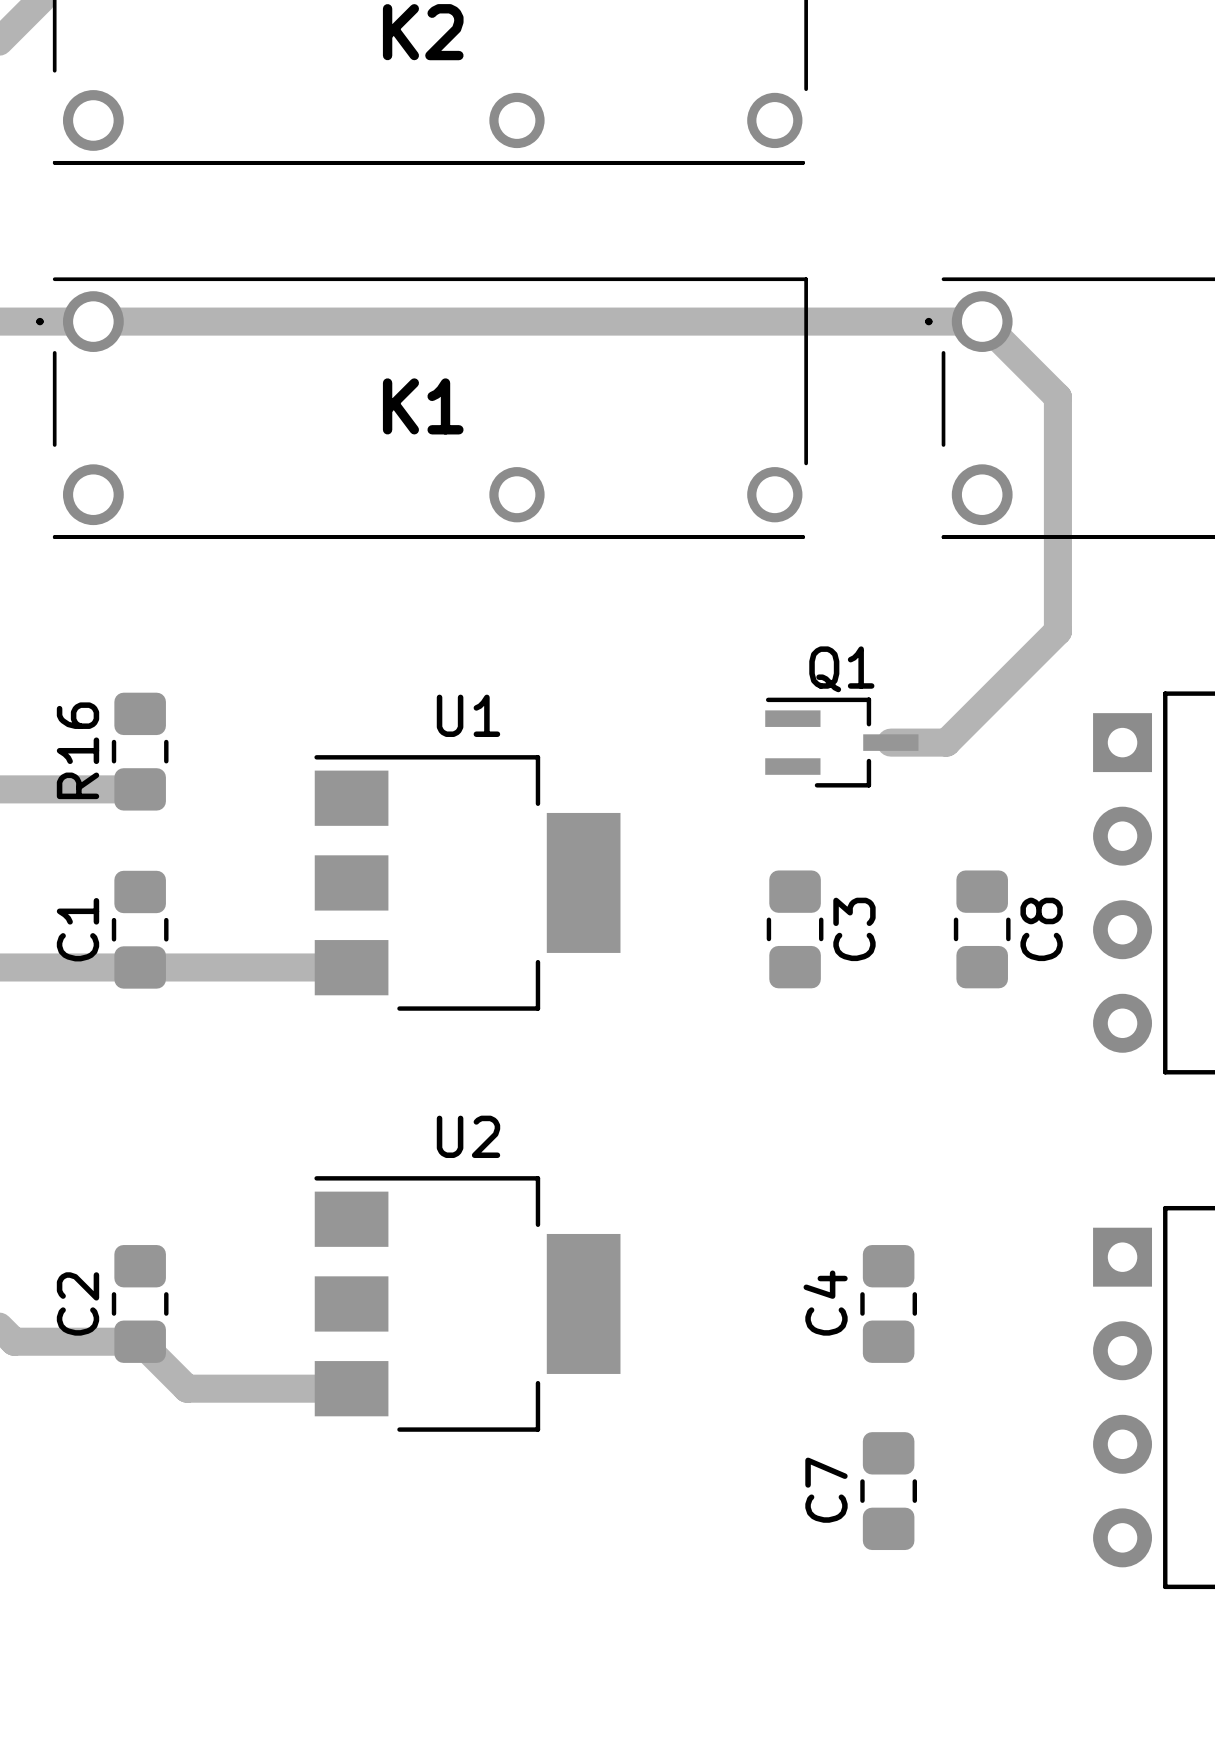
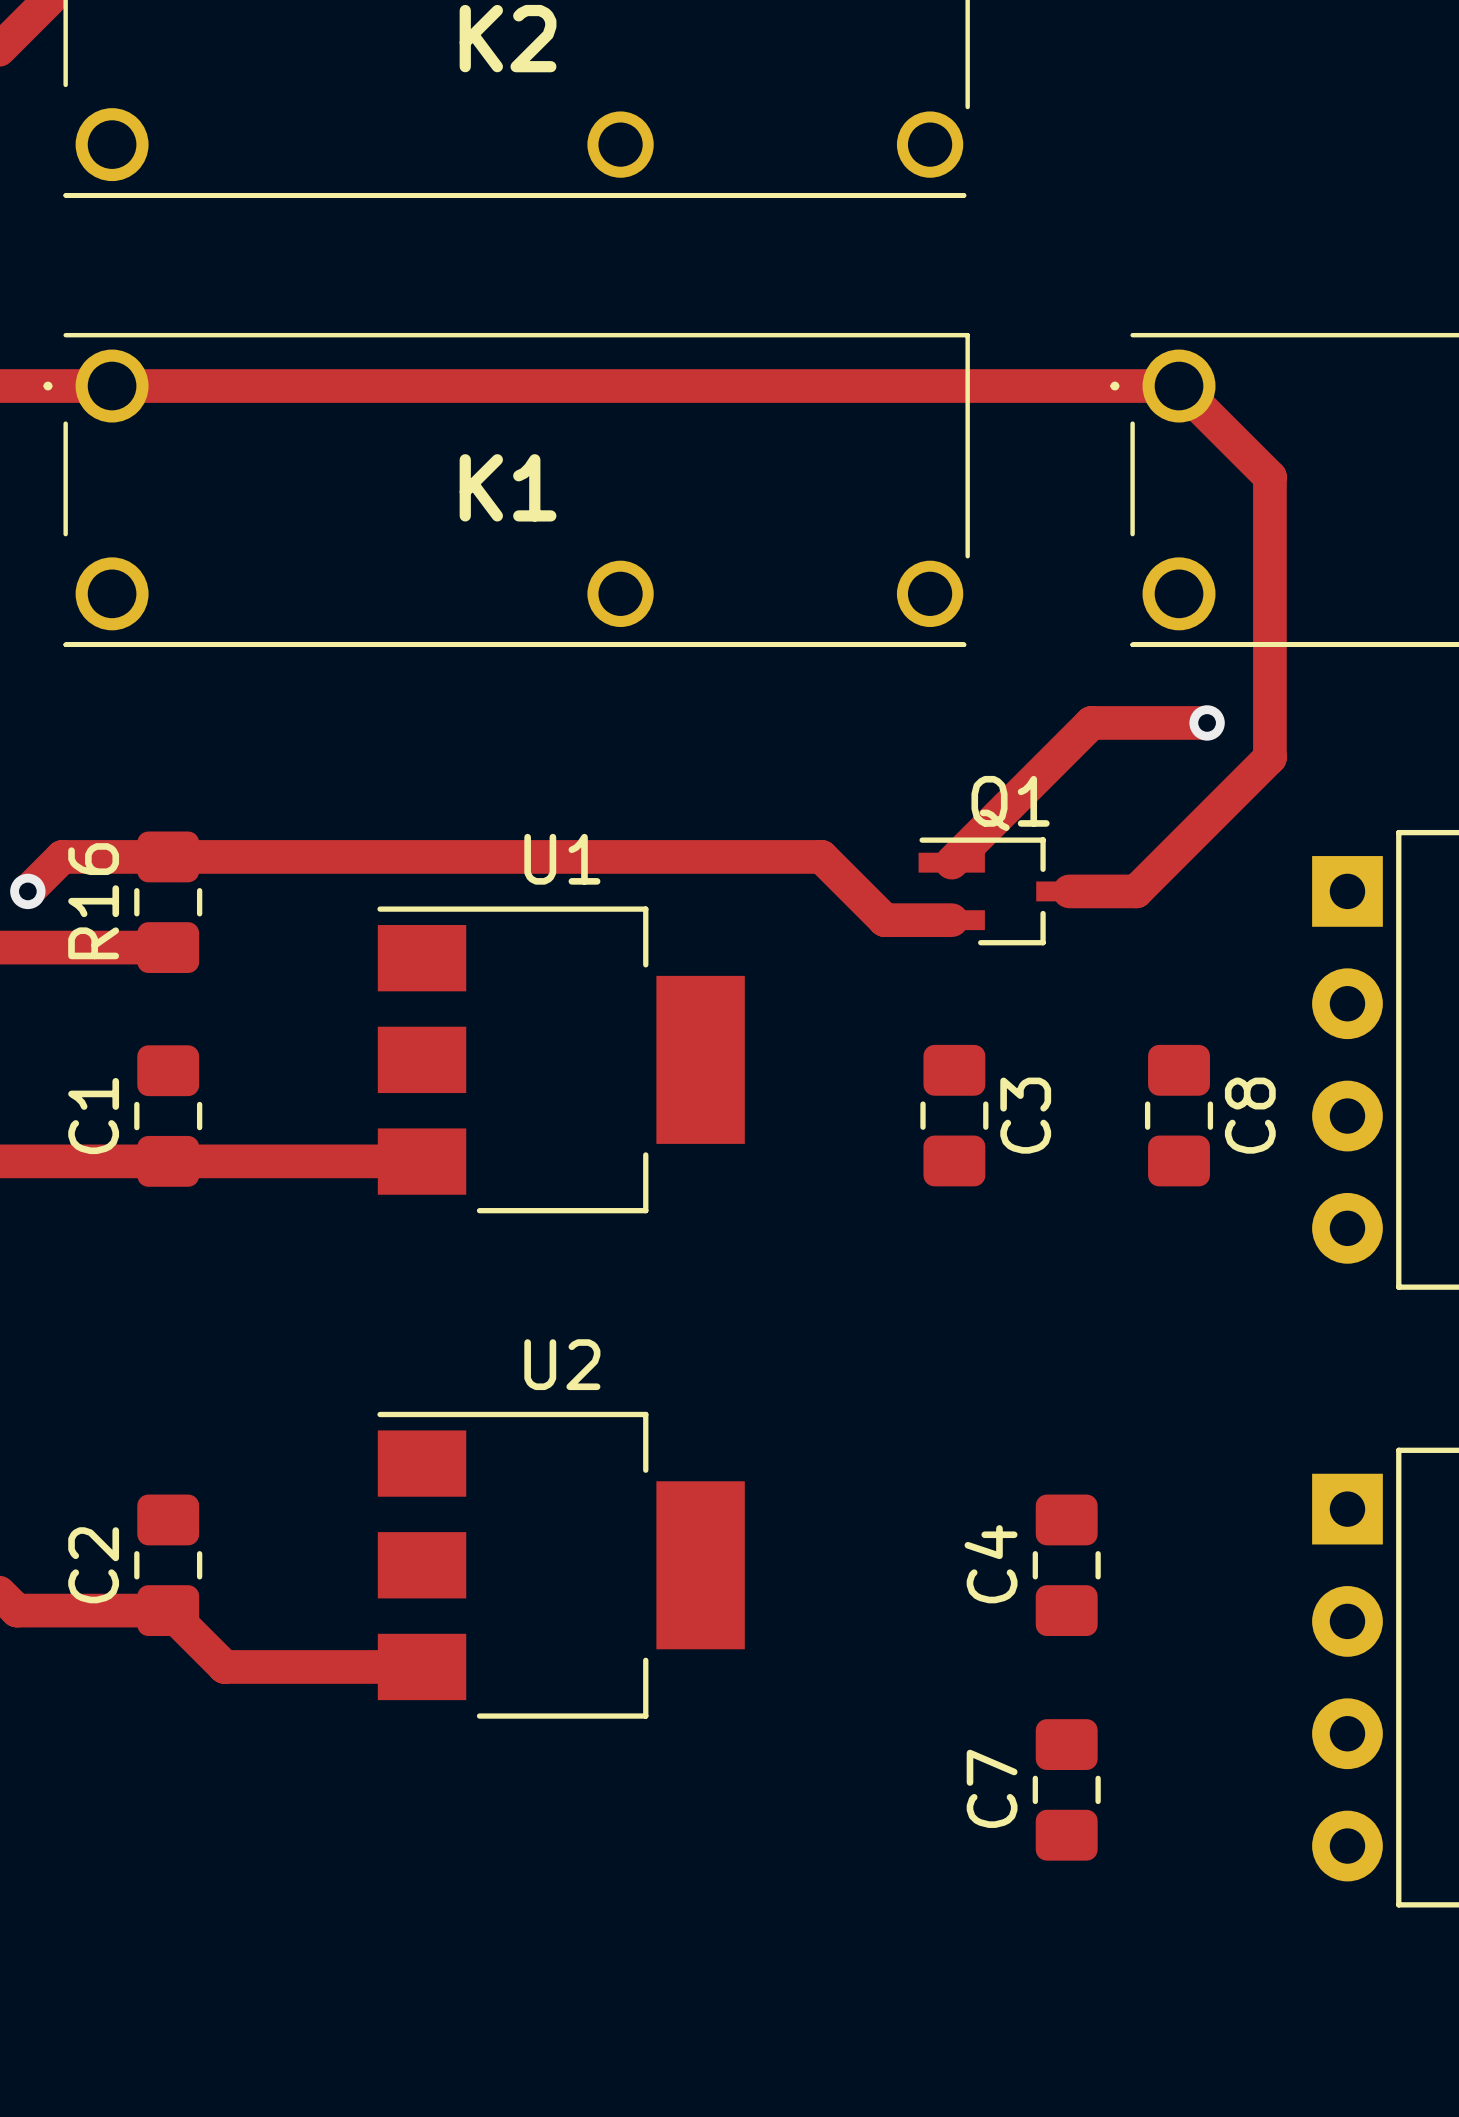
track: none -> (1207, 722) (1091, 722) (951, 862)
via: none -> (1207, 722)
track: none -> (27, 891) (62, 856) (821, 856) (884, 920) (951, 920)
via: none -> (27, 891)

